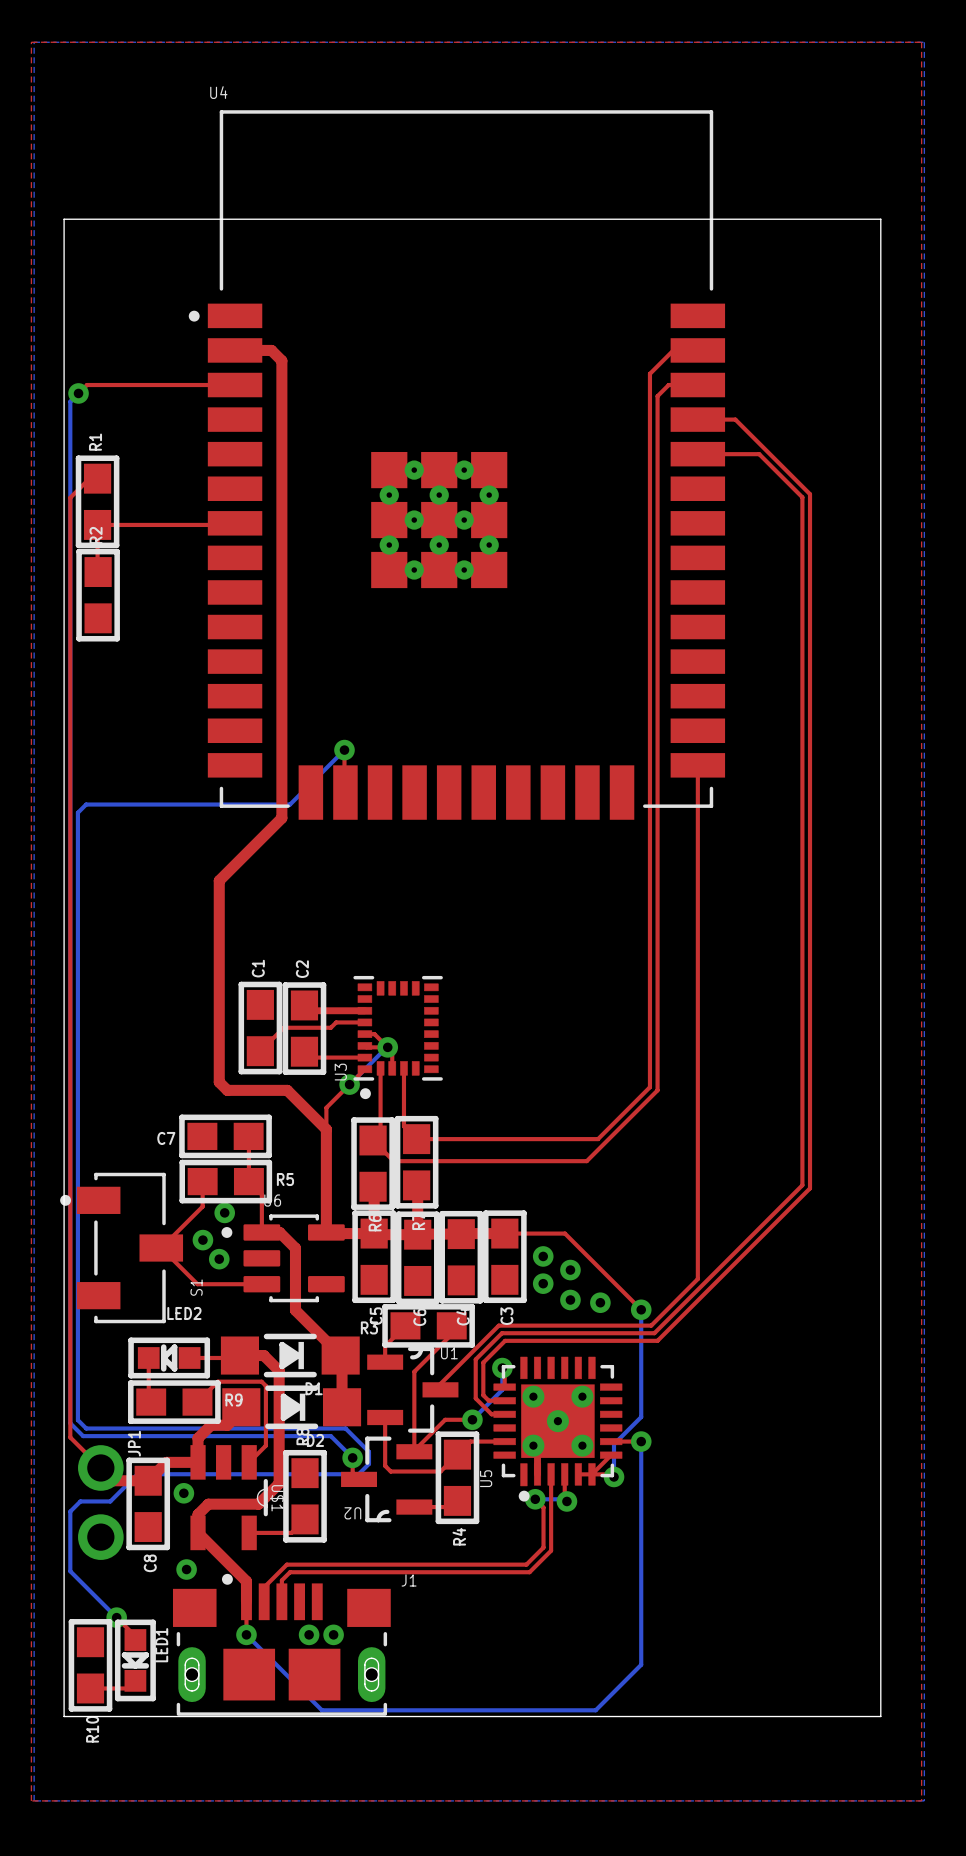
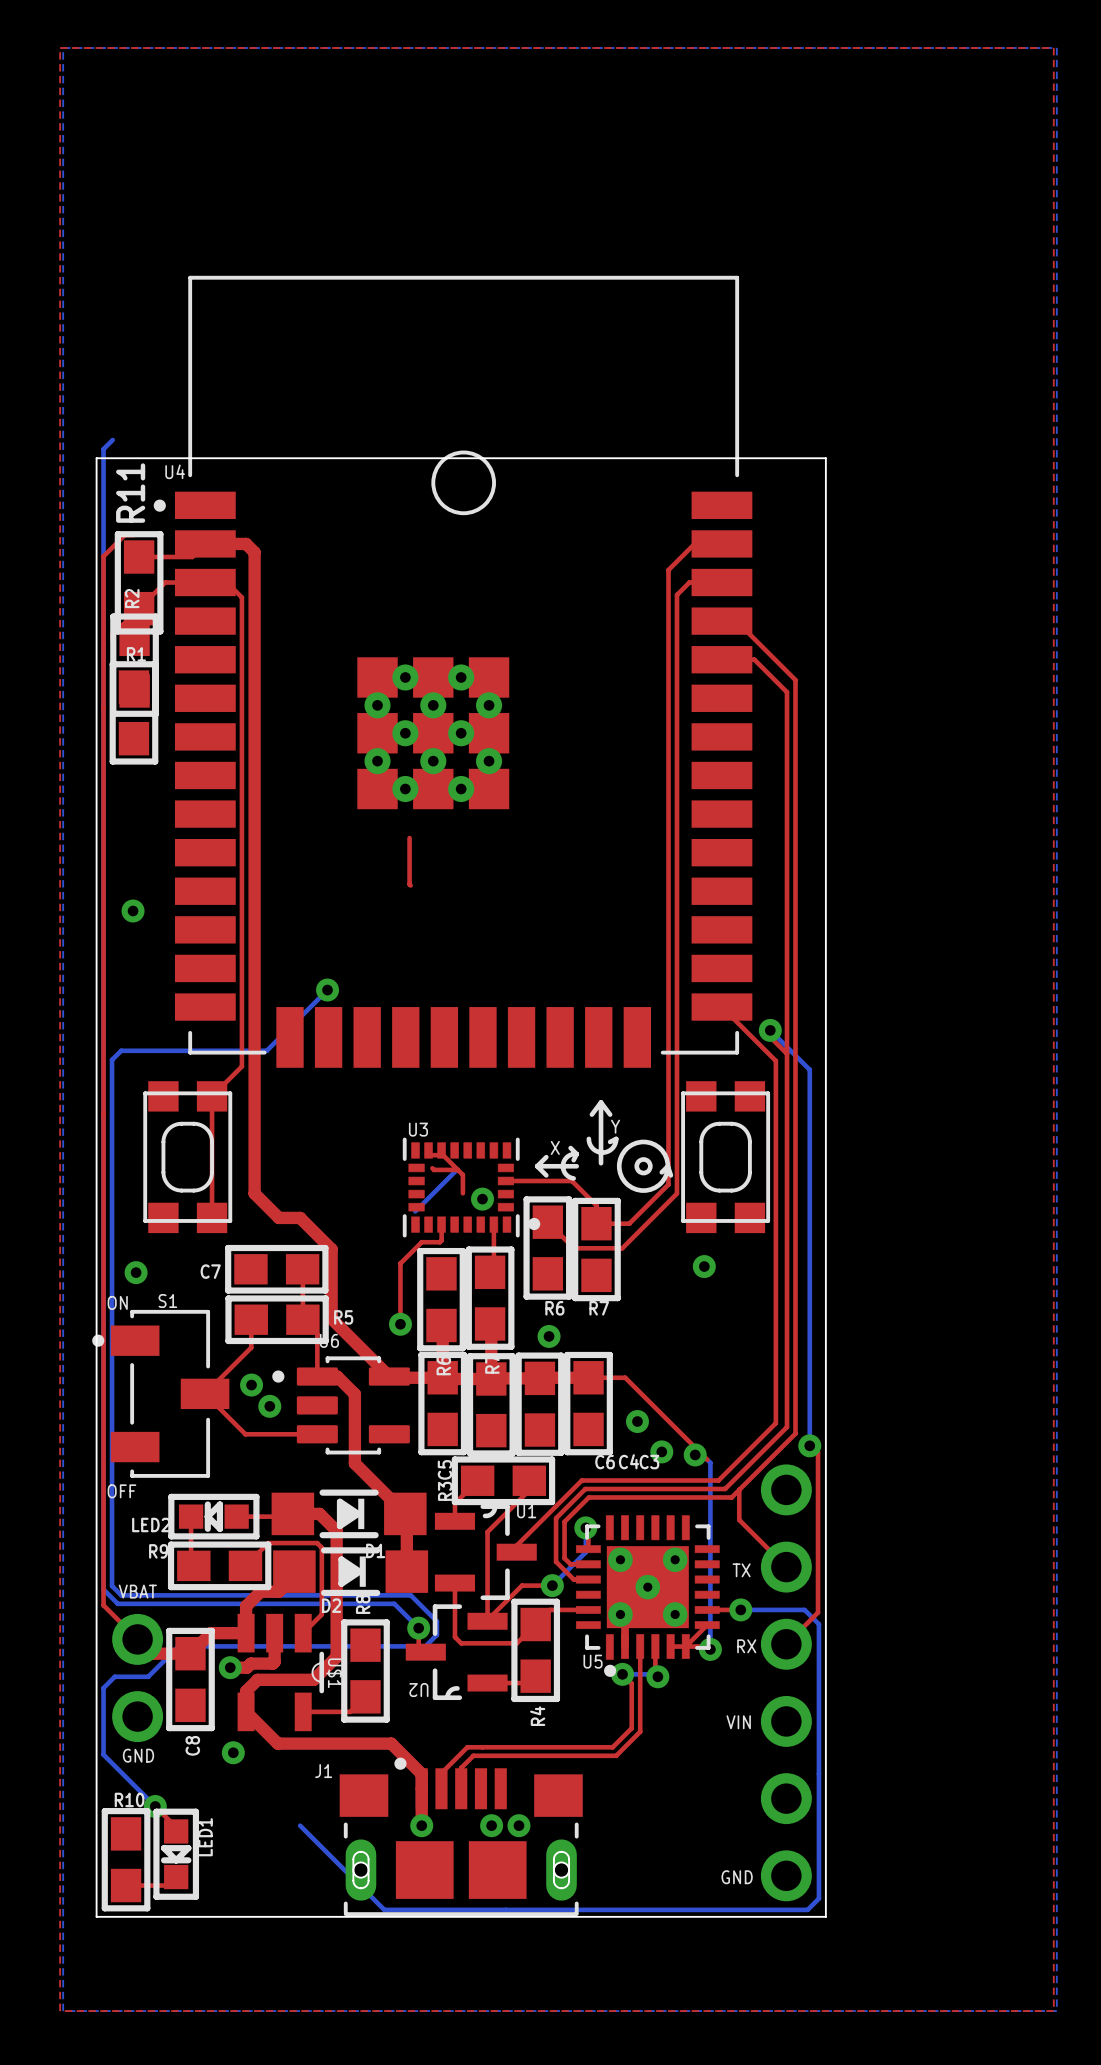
U4 name position: U4 (218, 92) -> U4 (175, 471)
U4 footprint: [188, 110, 726, 820] -> [153, 275, 753, 1068]
top track: (235, 350) (271, 350) (281, 360) (281, 818) (219, 880) (219, 1082) -> (139, 557) (192, 557) (205, 543) (246, 543) (254, 552) (254, 1193) (269, 1208)
top track: (697, 350) (673, 350) (649, 373) (649, 1087) (598, 1139) (416, 1139) (403, 1126) (403, 1068) -> none
top track: (235, 385) (86, 385) (78, 393) -> none
top track: (697, 385) (668, 385) (657, 396) (657, 1090) (586, 1161) (393, 1161) (373, 1140) (380, 1132) (380, 1068) -> none
via: (78, 393) -> none
board edge: (64, 409) (64, 219) (880, 219) (880, 1716) (717, 1716) -> (96, 458) (825, 458) (825, 1916)
top track: (697, 419) (735, 419) (810, 494) (810, 1188) (657, 1340) (633, 1340) -> (721, 621) (736, 621) (795, 680) (795, 1433) (731, 1497)
R1 name rotation: 0° (95, 442) -> 90° clockwise (136, 654)
top track: (697, 454) (759, 454) (802, 497) (802, 1185) (654, 1333) (627, 1333) -> (721, 659) (754, 659) (787, 692) (787, 1427) (725, 1489)
top track: none -> (721, 543) (694, 543) (668, 570) (668, 1184) (629, 1223) (596, 1223) (596, 1205) (571, 1181) (505, 1181)
R1 position: (97, 501) -> (133, 712)
R11: none -> (139, 582)
top track: none -> (721, 582) (689, 582) (676, 594) (676, 1193) (622, 1248) (573, 1248) (547, 1222)
top track: (235, 523) (235, 524) (97, 524) (97, 572) -> none
top track: none -> (112, 640) (112, 635) (165, 582) (226, 582) (241, 597) (241, 1066) (212, 1096) (212, 1217)
bottom track: (344, 750) (290, 804) (86, 804) (77, 812) (77, 948) -> (327, 990) (266, 1050) (121, 1050) (112, 1059)
via: (344, 750) -> none
top track: (697, 765) (697, 1279) (651, 1325) (621, 1325) -> (721, 1007) (775, 1060) (775, 1423) (718, 1480)
via: none -> (133, 911)
via: none -> (327, 990)
top track: none -> (770, 1030) (770, 1037) (787, 1053)
bottom track: none -> (770, 1030) (809, 1069) (809, 1445)
via: none -> (770, 1030)
line: none -> (601, 1102) (601, 1163)
line: none -> (601, 1102) (591, 1114)
line: none -> (601, 1102) (610, 1114)
top track: (304, 1005) (304, 1010) (364, 1010) -> none
text: none -> Y (615, 1126)
line: none -> (588, 1138) (592, 1148) (600, 1152) (612, 1148) (616, 1138) (610, 1141)
drawing: none -> [616, 1139, 671, 1193]
top track: (364, 1022) (336, 1022) (330, 1027) (283, 1027) (260, 1051) -> none
text: none -> X (555, 1147)
line: none -> (570, 1148) (576, 1154)
C1: (260, 1028) -> none
C2: (304, 1028) -> none
line: none -> (576, 1154) (573, 1160)
line: none -> (576, 1154) (567, 1156) (563, 1164) (565, 1173) (573, 1178)
part: none -> (187, 1157)
line: none -> (546, 1157) (537, 1166)
part: none -> (725, 1157)
U3 rotation: 0° (398, 1037) -> 90° counterclockwise (471, 1187)
line: none -> (537, 1166) (576, 1166)
line: none -> (537, 1166) (546, 1175)
via: (387, 1047) -> none
line: none -> (661, 1172) (667, 1166) (670, 1175)
top track: (304, 1051) (310, 1057) (364, 1057) -> none
top track: (364, 1069) (326, 1107) (326, 1232) (326, 1129) (287, 1090) (246, 1090) -> (389, 1376) (331, 1318) (331, 1249) (300, 1217)
U3 name position: U3 (340, 1072) -> U3 (418, 1129)
via: none -> (482, 1199)
via: (349, 1084) -> none
top track: none -> (441, 1224) (441, 1240) (439, 1242) (421, 1242) (400, 1263) (400, 1324)
top track: none -> (493, 1224) (493, 1267)
R6: none -> (547, 1248)
R7: none -> (596, 1249)
via: none -> (704, 1266)
via: none -> (136, 1272)
text: none -> ON (117, 1302)
via: none -> (400, 1324)
via: none -> (549, 1336)
via: (224, 1212) -> none
top track: (537, 1233) (565, 1233) (641, 1309) -> (625, 1377) (707, 1459)
via: (543, 1256) -> none
via: (570, 1270) -> none
via: none -> (637, 1421)
via: (543, 1283) -> none
S1 name rotation: 0° (196, 1287) -> 90° clockwise (167, 1301)
S1 name position: S1 (196, 1287) -> S1 (167, 1301)
top track: none -> (809, 1445) (818, 1452) (818, 1612) (786, 1644)
via: none -> (809, 1445)
bottom track: (641, 1309) (641, 1417) (614, 1444) -> (707, 1459) (710, 1462) (710, 1612)
via: (641, 1309) -> none
LED2 name position: LED2 (184, 1313) -> LED2 (151, 1524)
C4 name rotation: 0° (463, 1316) -> 90° clockwise (629, 1461)
C4 name position: C4 (463, 1316) -> C4 (629, 1461)
C3 name rotation: 0° (506, 1316) -> 90° clockwise (649, 1462)
C3 name position: C3 (506, 1316) -> C3 (649, 1462)
C6 name rotation: 0° (419, 1317) -> 90° clockwise (605, 1462)
C6 name position: C6 (419, 1317) -> C6 (605, 1462)
R3 name rotation: 0° (369, 1327) -> 90° counterclockwise (445, 1491)
top track: none -> (739, 1489) (739, 1519) (786, 1567)
text: none -> OFF (121, 1491)
R9 name position: R9 (234, 1400) -> R9 (158, 1551)
text: none -> TX (741, 1570)
text: none -> VBAT (137, 1591)
D2 name position: D2 (315, 1440) -> D2 (331, 1605)
bottom track: (641, 1441) (641, 1664) (595, 1710) -> (740, 1609) (804, 1609) (818, 1624) (818, 1898) (807, 1909) (690, 1909)
JP1 name: JP1 (134, 1443) -> none
top track: none -> (274, 1633) (274, 1661) (272, 1663) (250, 1663) (246, 1667) (230, 1667)
text: none -> RX (746, 1646)
U5 name rotation: 0° (486, 1478) -> 90° clockwise (593, 1661)
U5 name position: U5 (486, 1478) -> U5 (593, 1661)
part: none -> (786, 1682)
text: none -> VIN (738, 1722)
top track: (226, 1561) (246, 1581) (246, 1634) -> (277, 1743) (391, 1743) (421, 1774) (421, 1825)
top track: (396, 1564) (286, 1564) (264, 1587) (264, 1601) -> (467, 1747) (441, 1773) (441, 1788)
text: none -> GND (138, 1755)
top track: (401, 1572) (290, 1572) (281, 1580) (281, 1601) -> (473, 1755) (461, 1767) (461, 1788)
J1 name position: J1 (409, 1580) -> J1 (323, 1771)
via: (246, 1634) -> none
via: (309, 1634) -> none
via position: (333, 1634) -> (421, 1825)
via: none -> (491, 1825)
via: none -> (518, 1825)
J1 position: (281, 1644) -> (461, 1836)
text: none -> GND (737, 1877)
R10 name rotation: 0° (92, 1729) -> 90° clockwise (129, 1799)
R10 name position: R10 (92, 1729) -> R10 (129, 1799)

